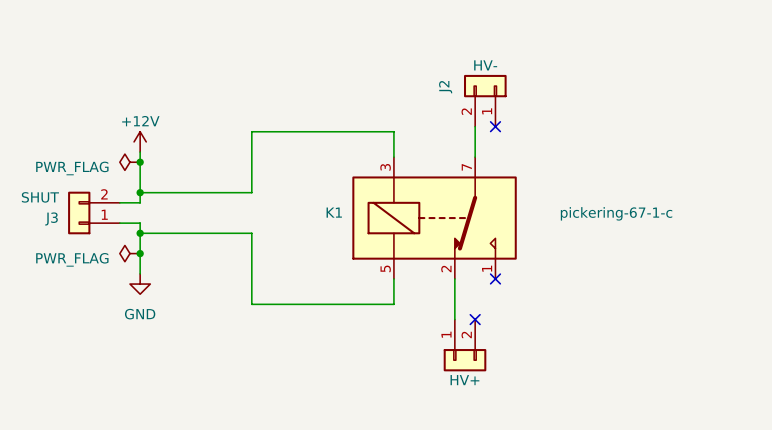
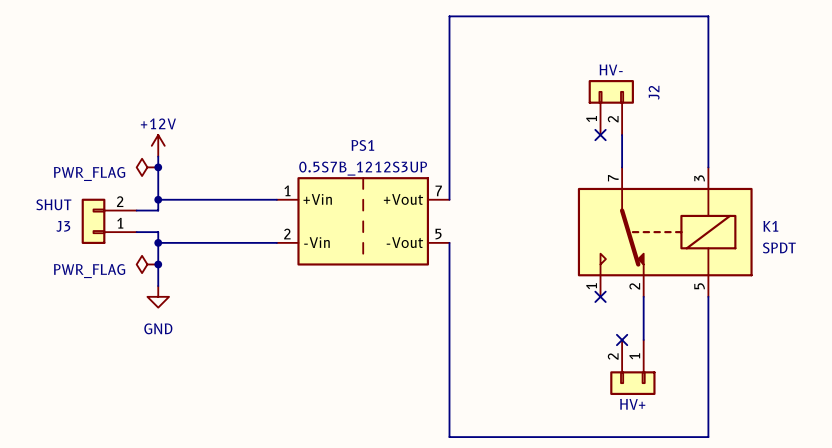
J2 flip: as is (485, 86) -> left-right (611, 91)
J2 position: (485, 100) -> (611, 107)
wire: (475, 126) (475, 157) -> (622, 135) (622, 167)
no-connect mark: (495, 126) -> none
no-connect mark: none -> (600, 135)
wire: (393, 157) (393, 131) (251, 131) (251, 192) -> none
wire: none -> (708, 167) (708, 16) (449, 16) (449, 199)
PS1: none -> 0.5S7B_1212S3UP (363, 221)
K1 value: pickering-67-1-c (616, 213) -> SPDT (779, 247)
K1 flip: as is (434, 218) -> left-right (665, 232)
K1 position: (434, 218) -> (665, 232)
wire: (251, 233) (251, 304) (393, 304) (393, 278) -> none
wire: none -> (449, 242) (449, 437) (708, 437) (708, 296)
wire: (454, 278) (454, 319) -> (643, 296) (643, 339)
no-connect mark: (495, 278) -> none
no-connect mark: none -> (600, 296)
no-connect mark: (475, 319) -> none
no-connect mark: none -> (622, 339)
part: HV+ (465, 345) -> none
part: none -> HV+ (632, 367)

